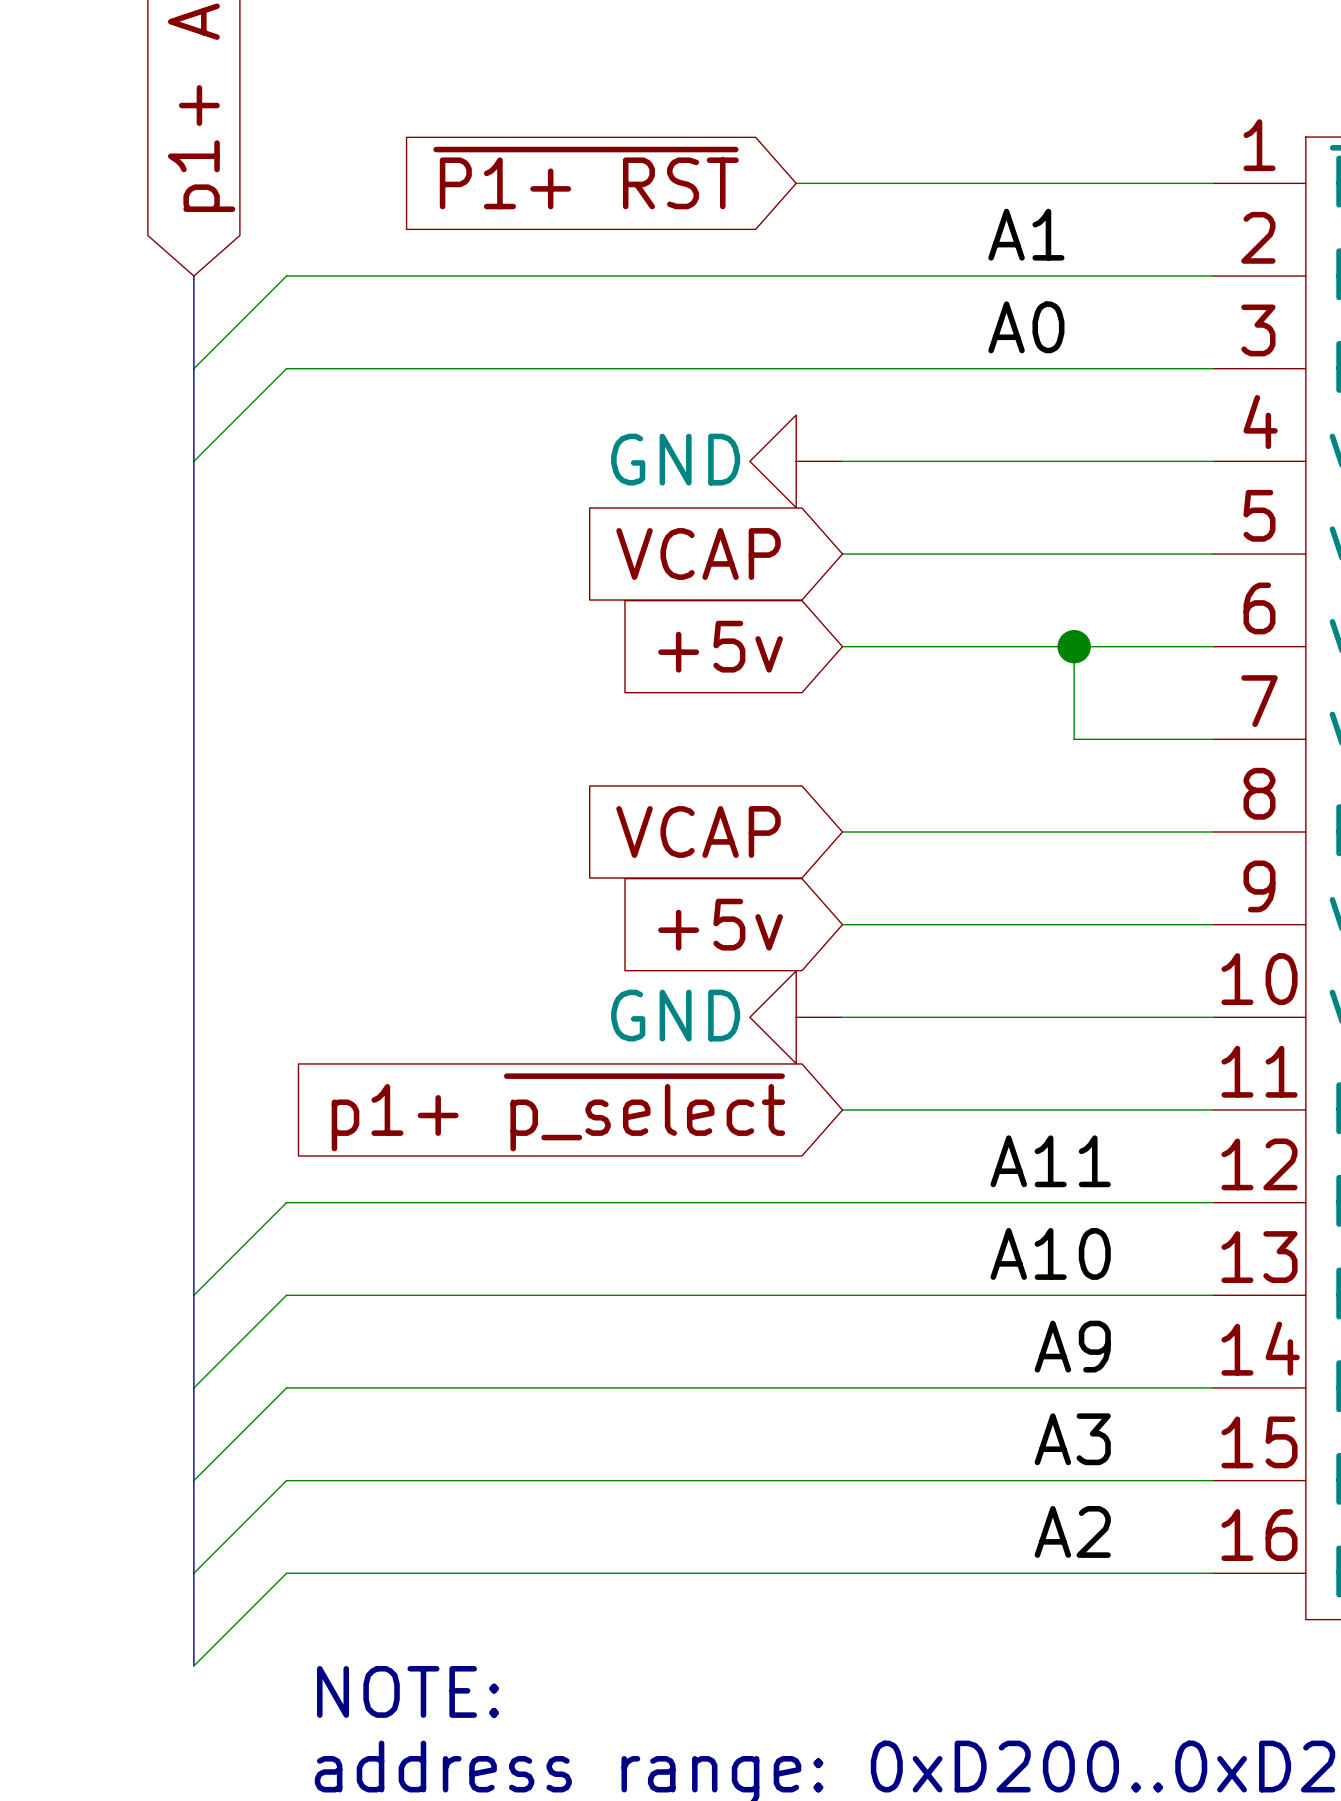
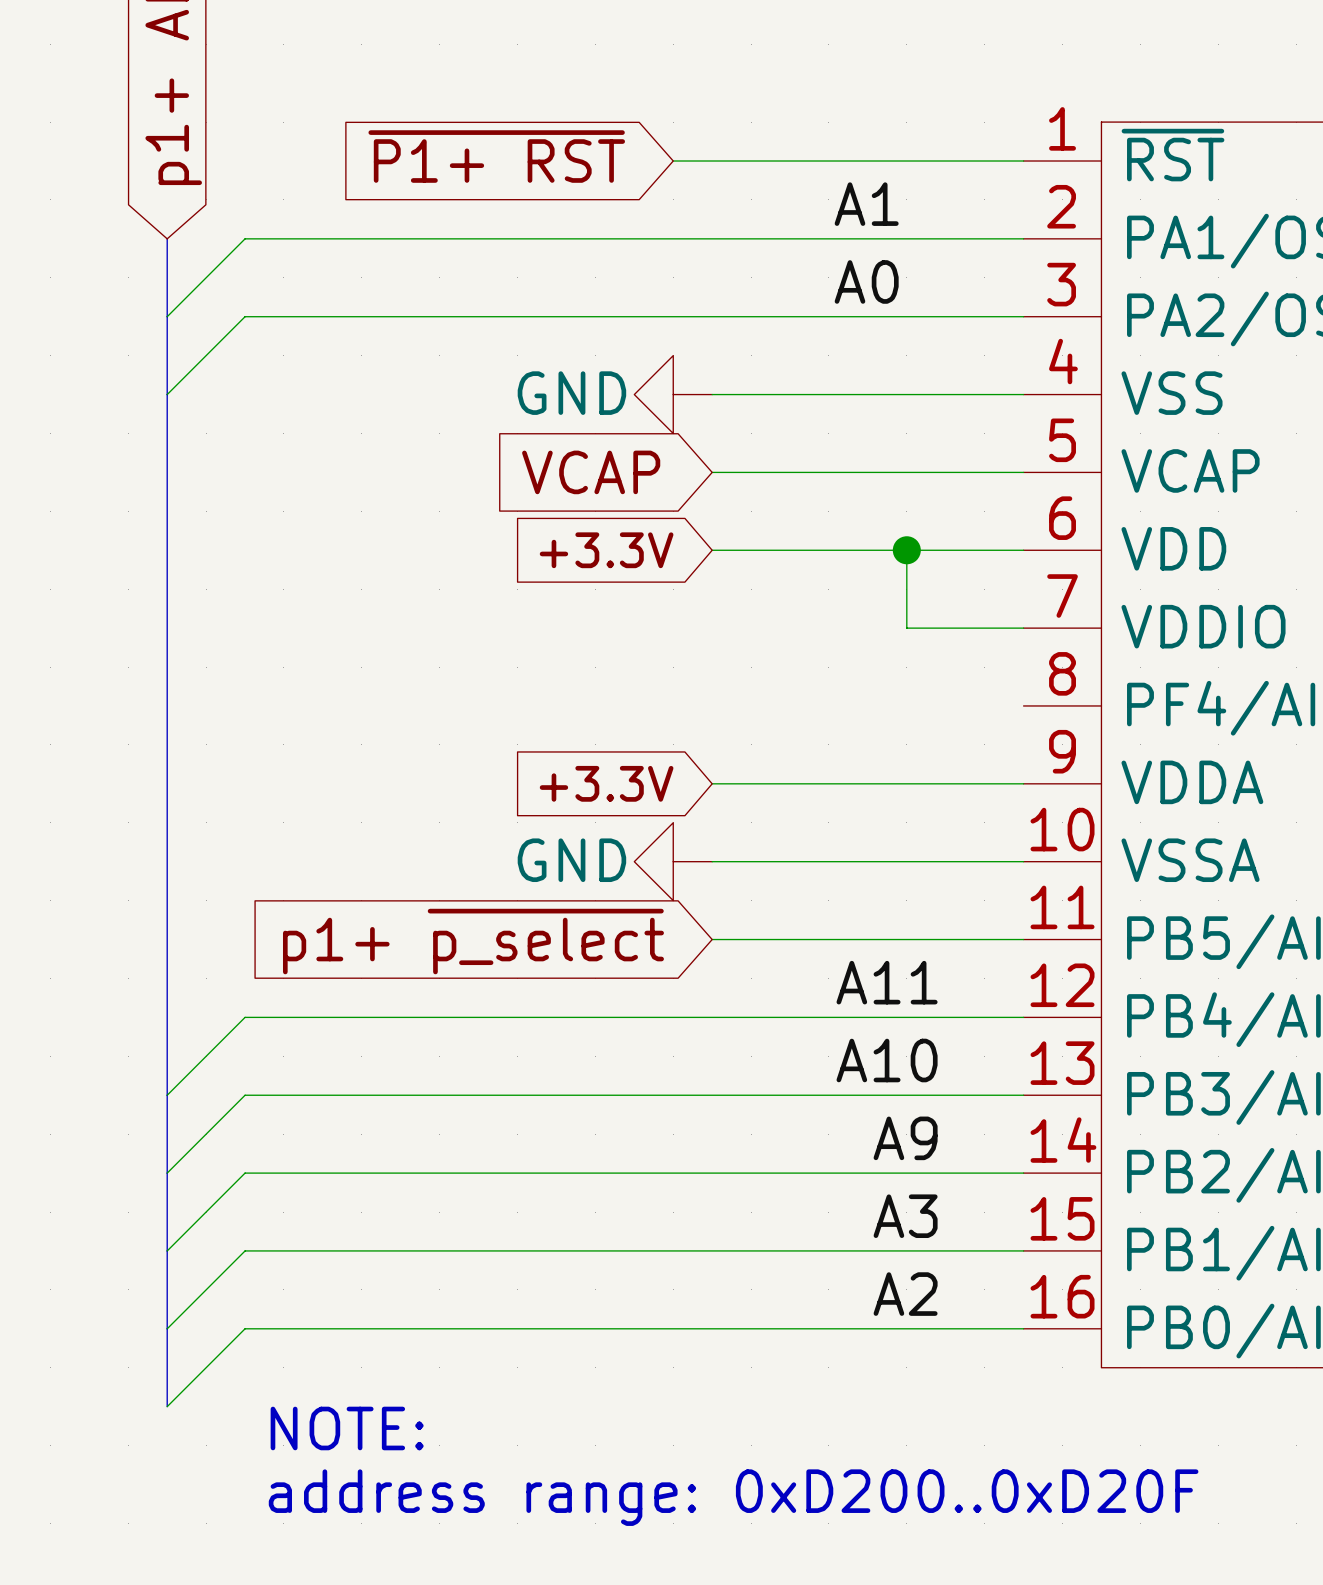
global label: +5v (720, 646) -> +3.3V (606, 550)
global label: VCAP (698, 831) -> none
wire: (842, 831) (1213, 831) -> none
global label: +5v (720, 924) -> +3.3V (606, 783)

